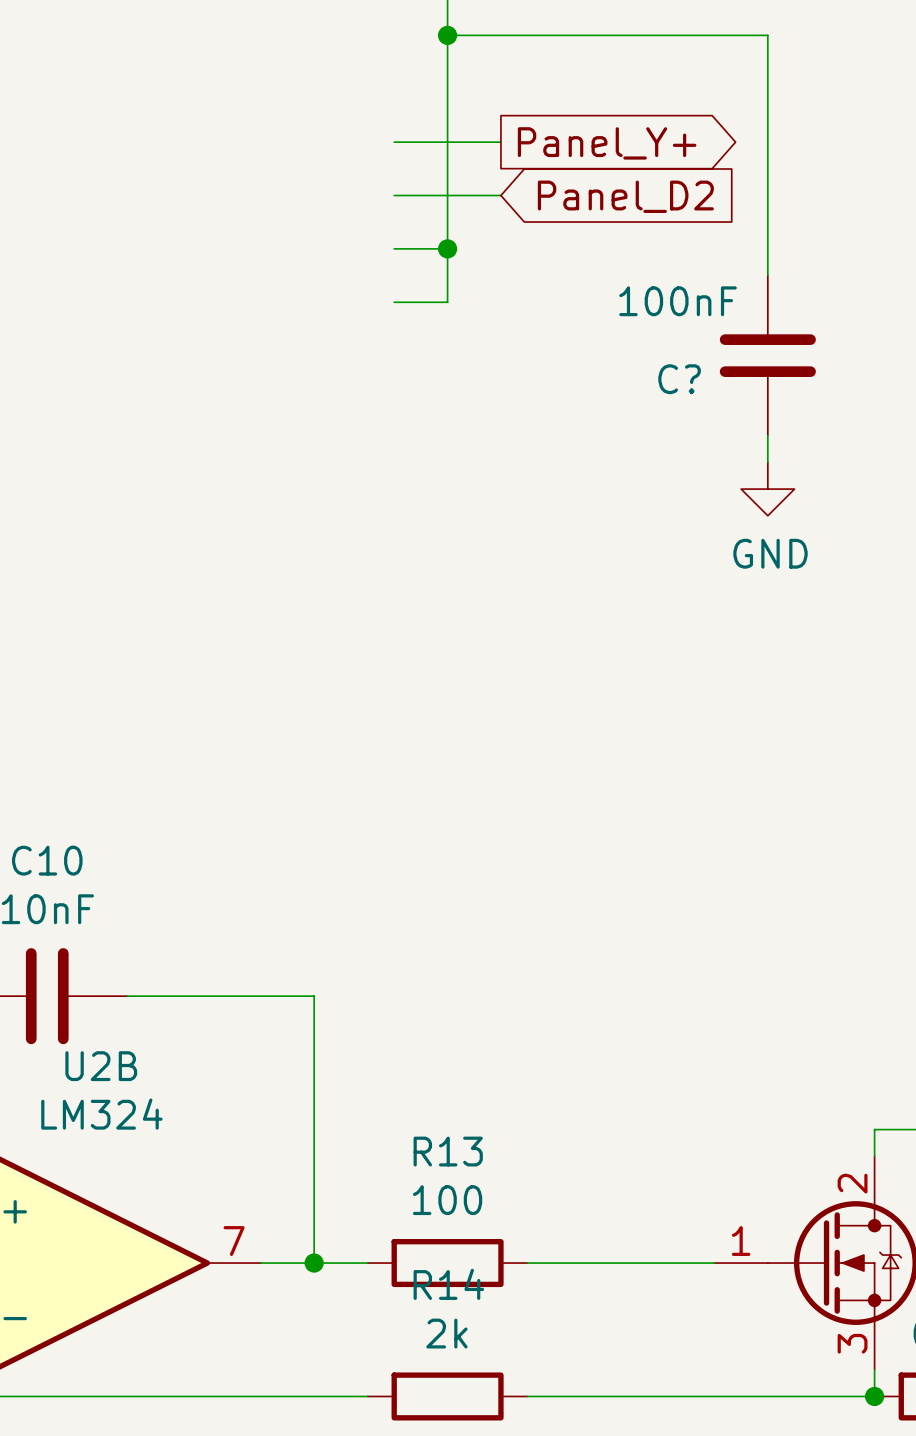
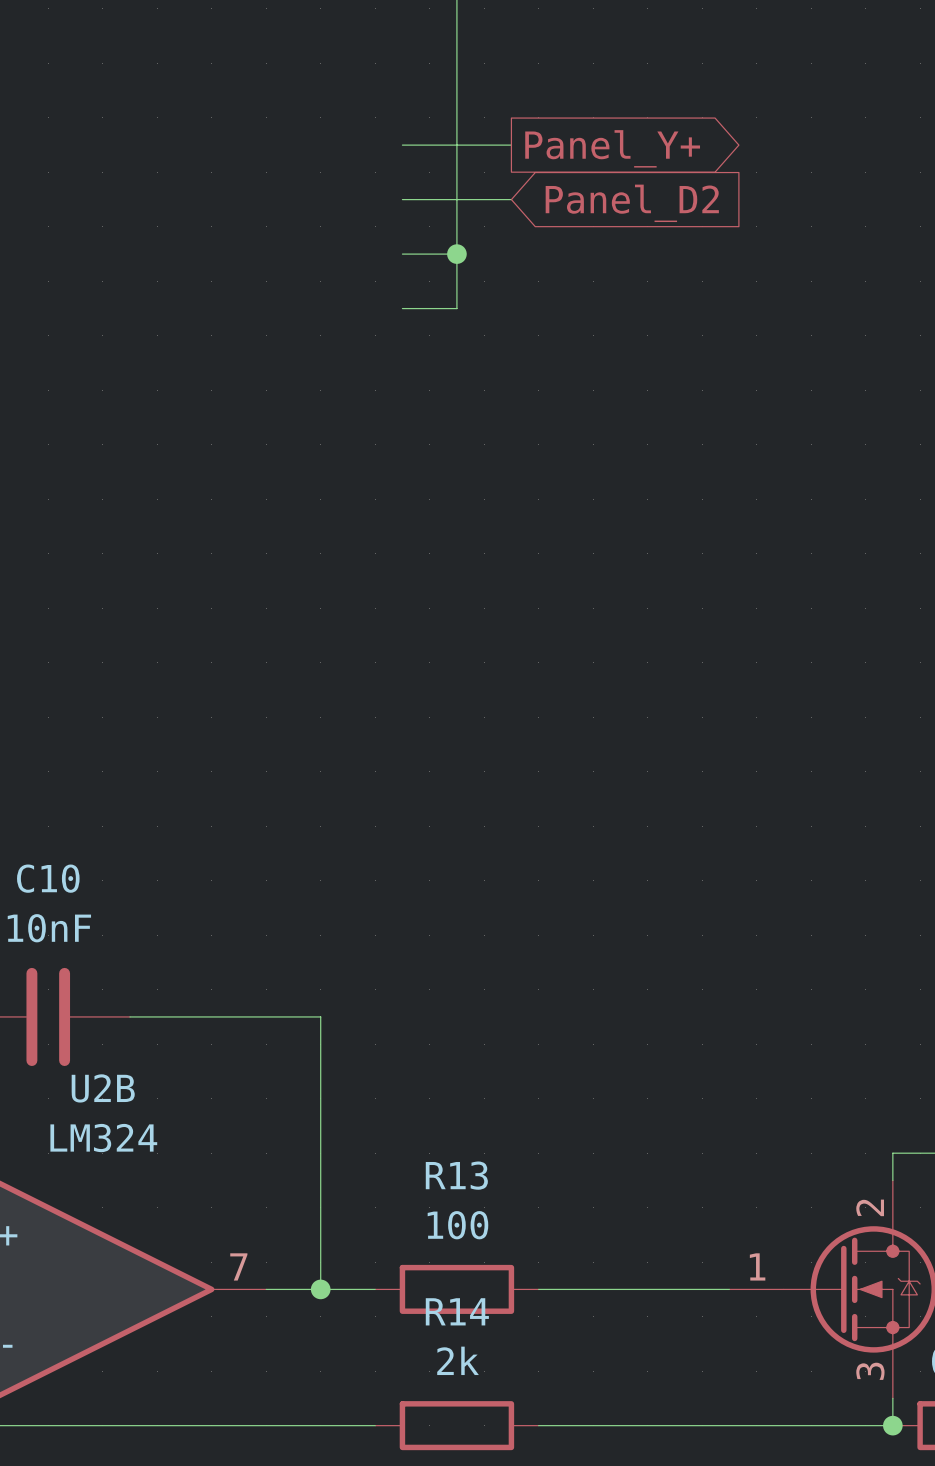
wire: (447, 35) (767, 35) (767, 275) -> none
junction: (447, 35) -> none
C?: 100nF (767, 355) -> none
wire: (767, 435) (767, 462) -> none
power symbol: GND (767, 489) -> none

